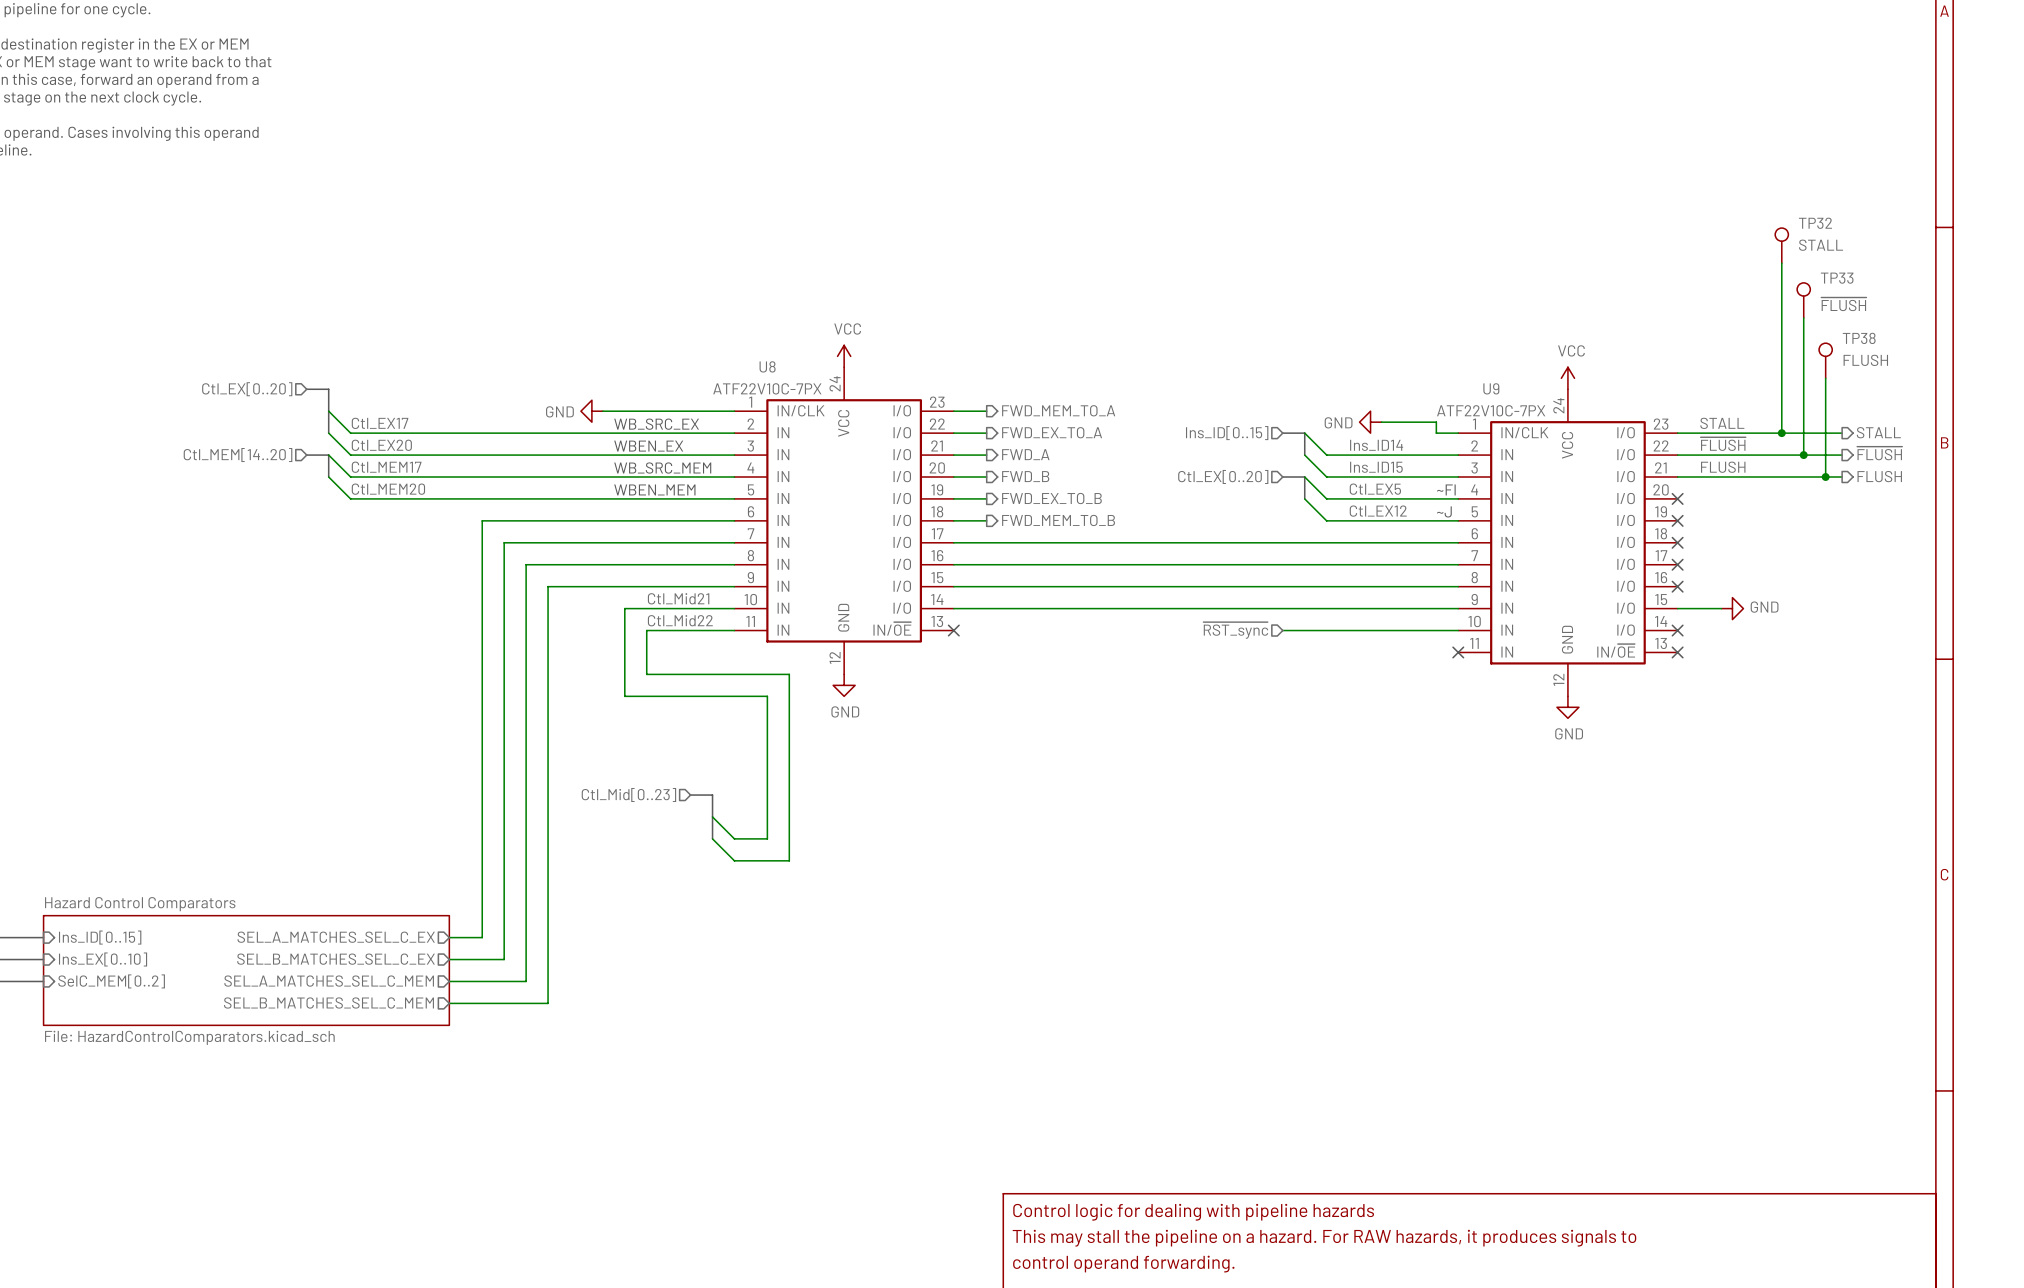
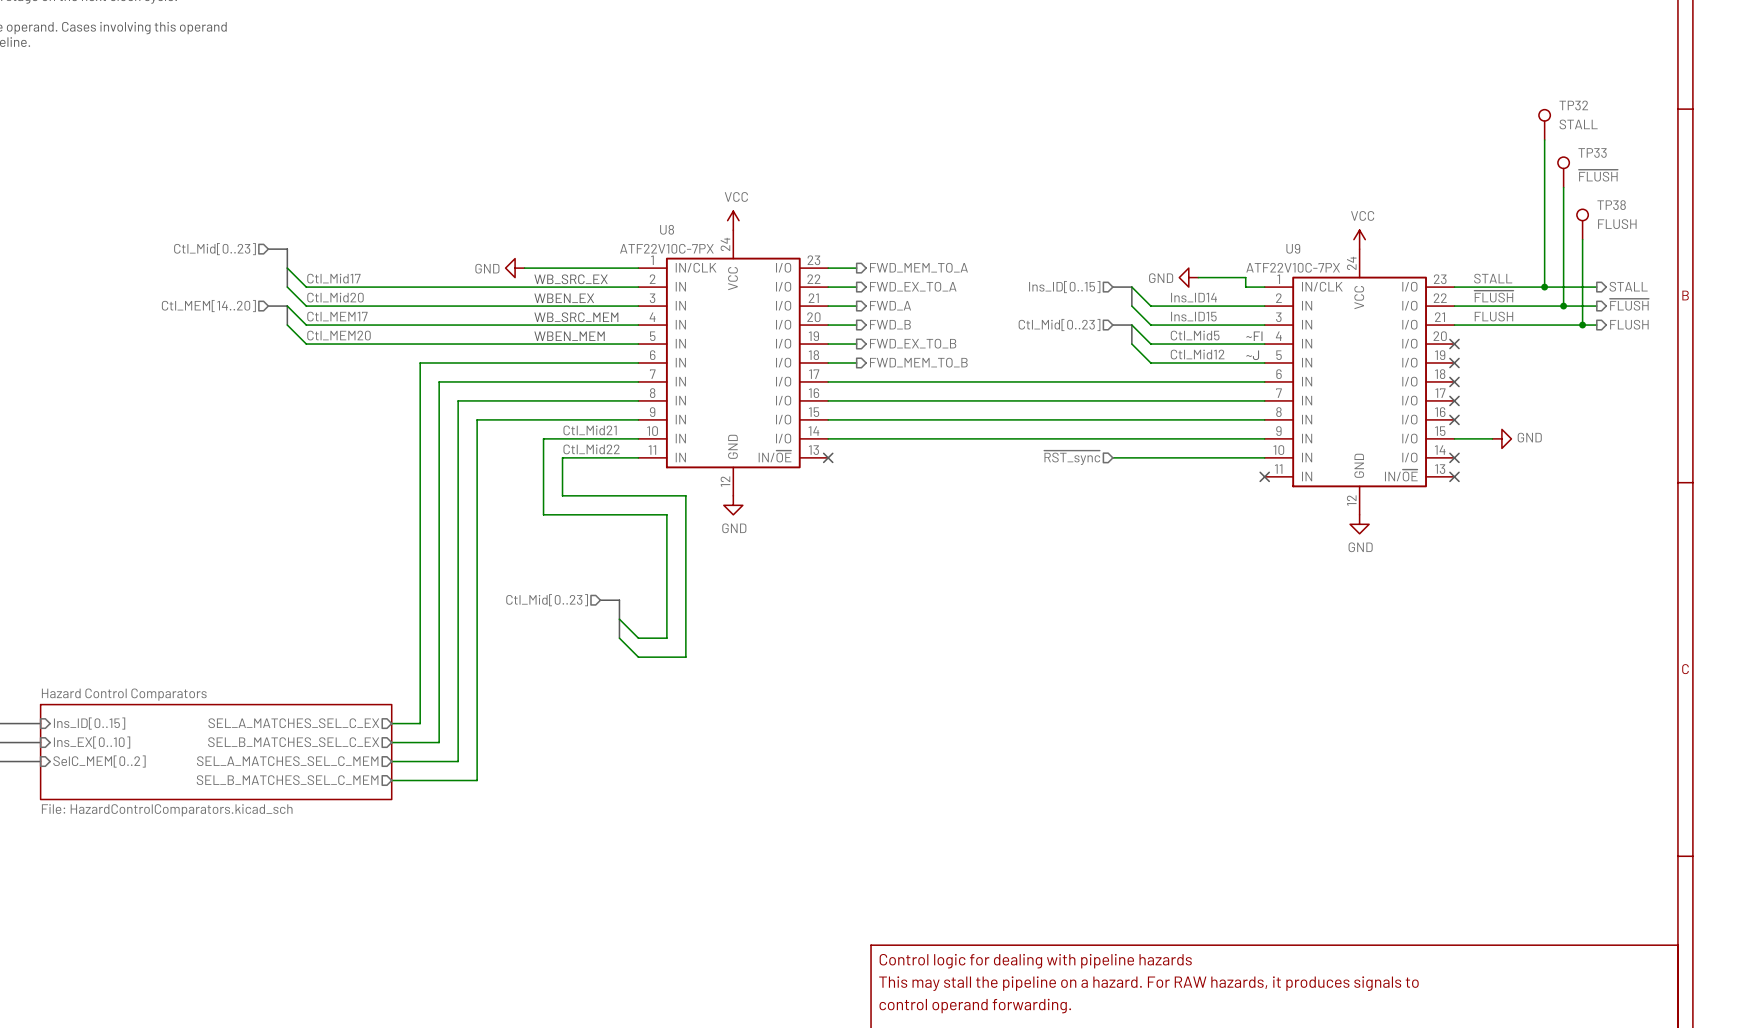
hierarchical label: Ctl_EX[0..20] (247, 389) -> Ctl_Mid[0..23] (215, 249)
label: Ctl_EX17 (380, 423) -> Ctl_Mid17 (333, 278)
label: Ctl_EX20 (381, 445) -> Ctl_Mid20 (335, 297)
hierarchical label: Ctl_EX[0..20] (1223, 476) -> Ctl_Mid[0..23] (1059, 325)
label: Ctl_EX5 (1375, 489) -> Ctl_Mid5 (1195, 335)
label: Ctl_EX12 (1378, 511) -> Ctl_Mid12 (1197, 354)

